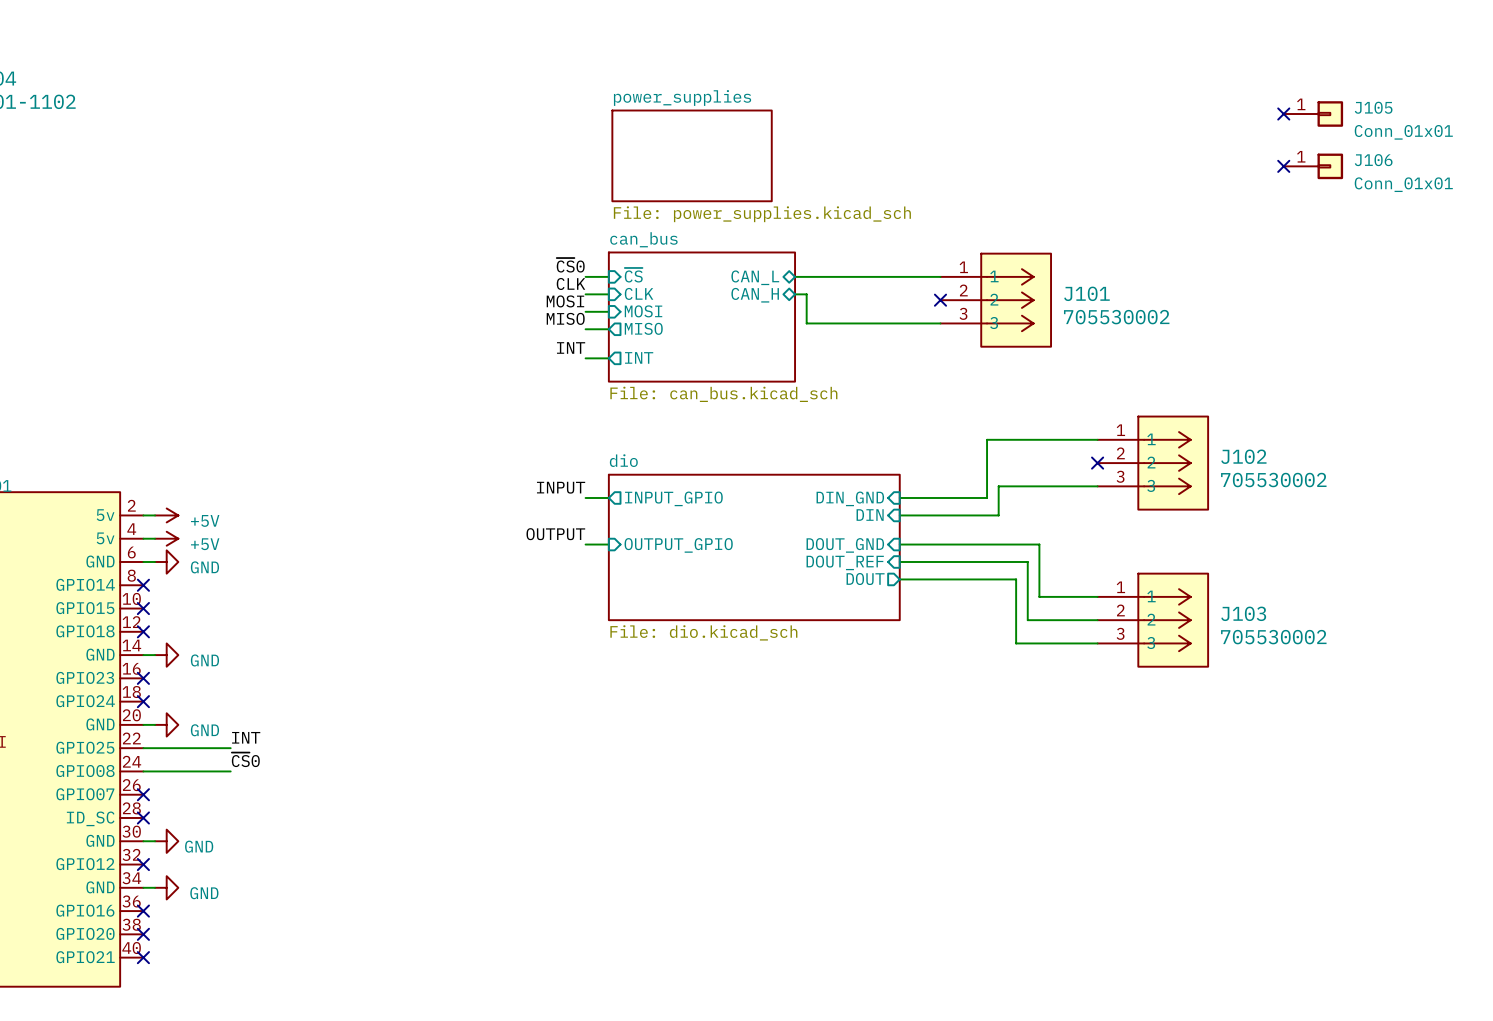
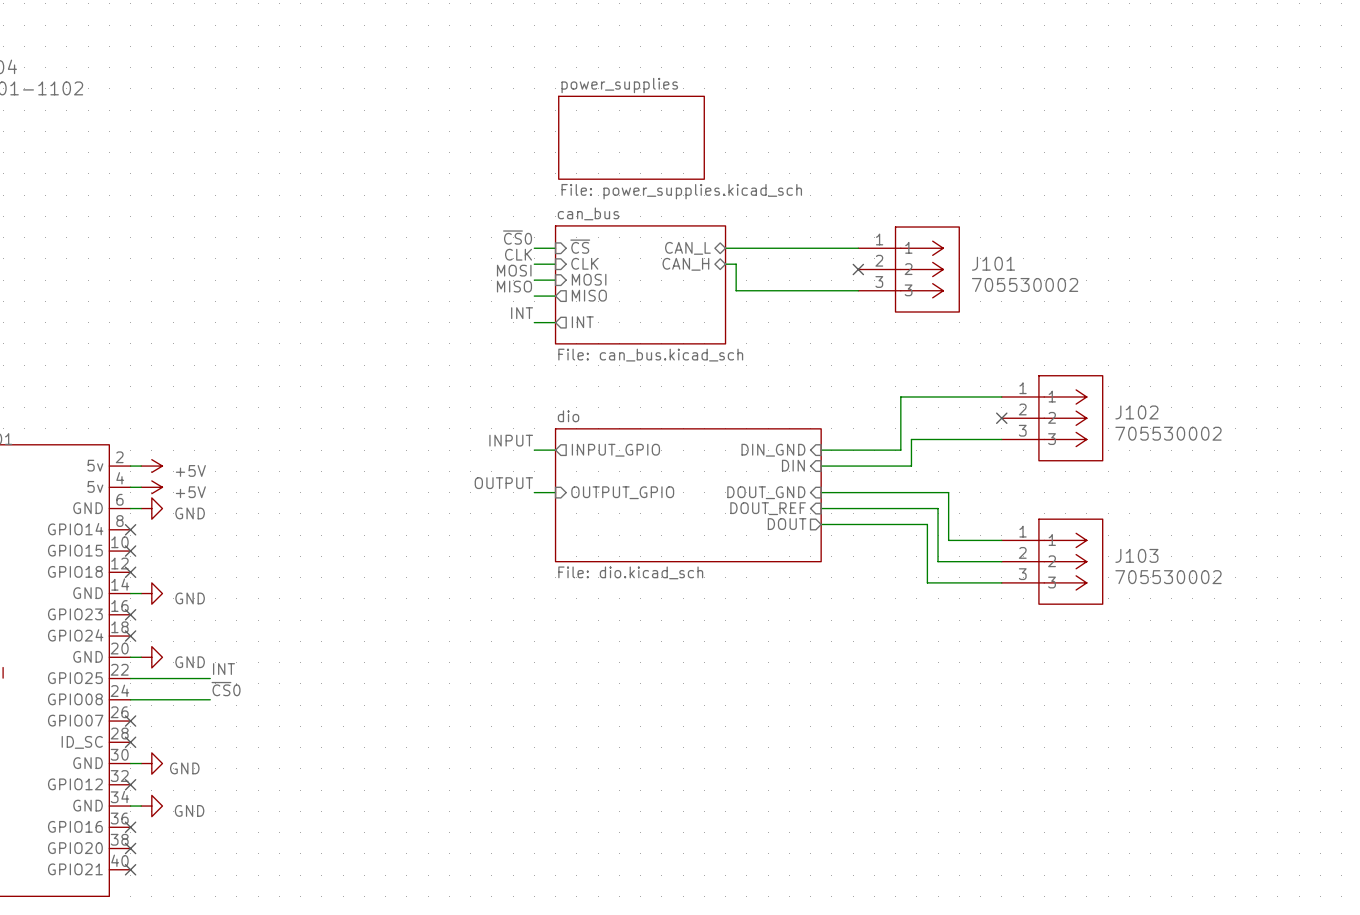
no-connect mark: (1283, 114) -> none
J105: Conn_01x01 (1313, 114) -> none
no-connect mark: (1283, 166) -> none
J106: Conn_01x01 (1313, 166) -> none

